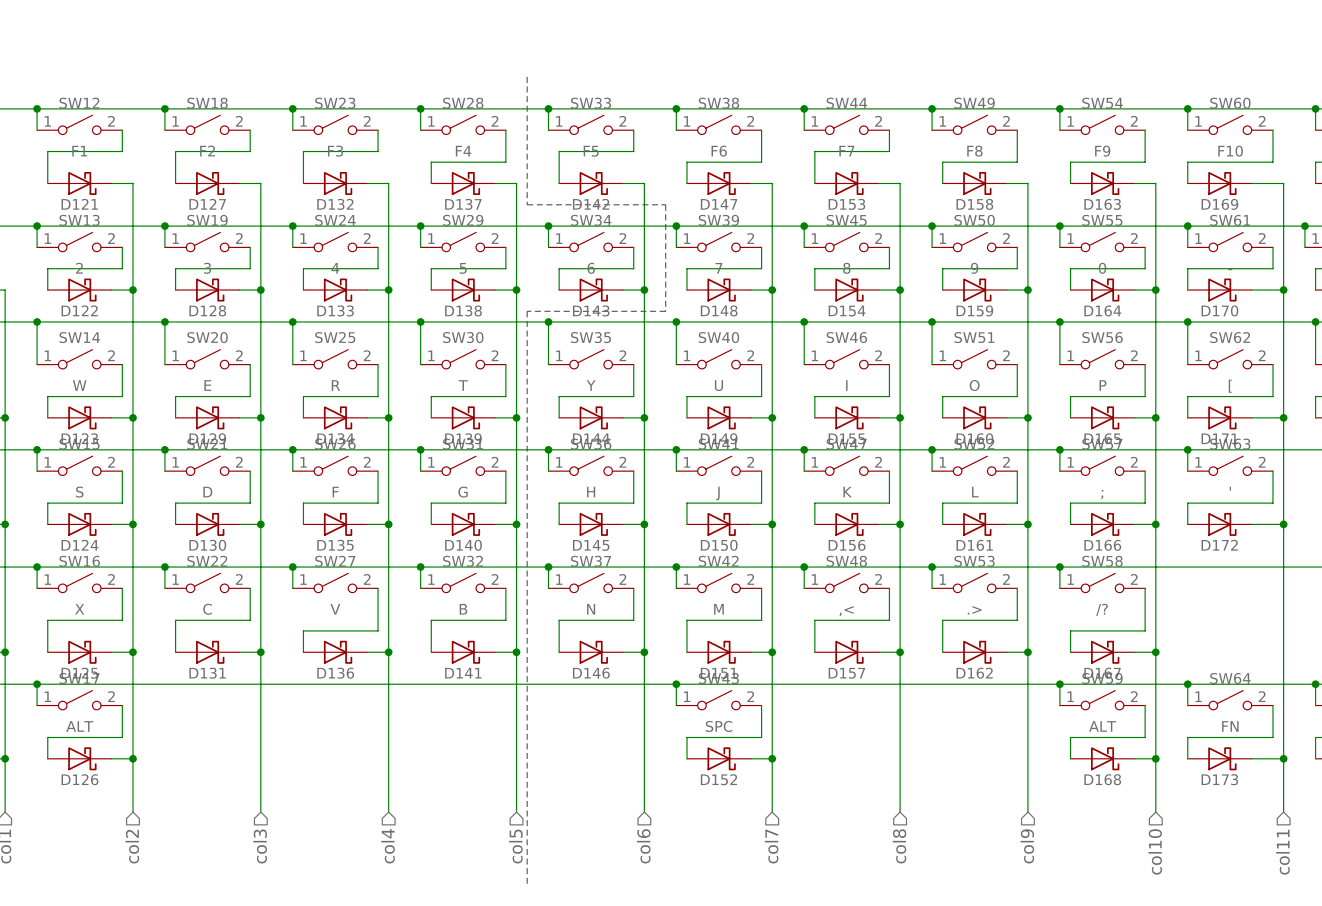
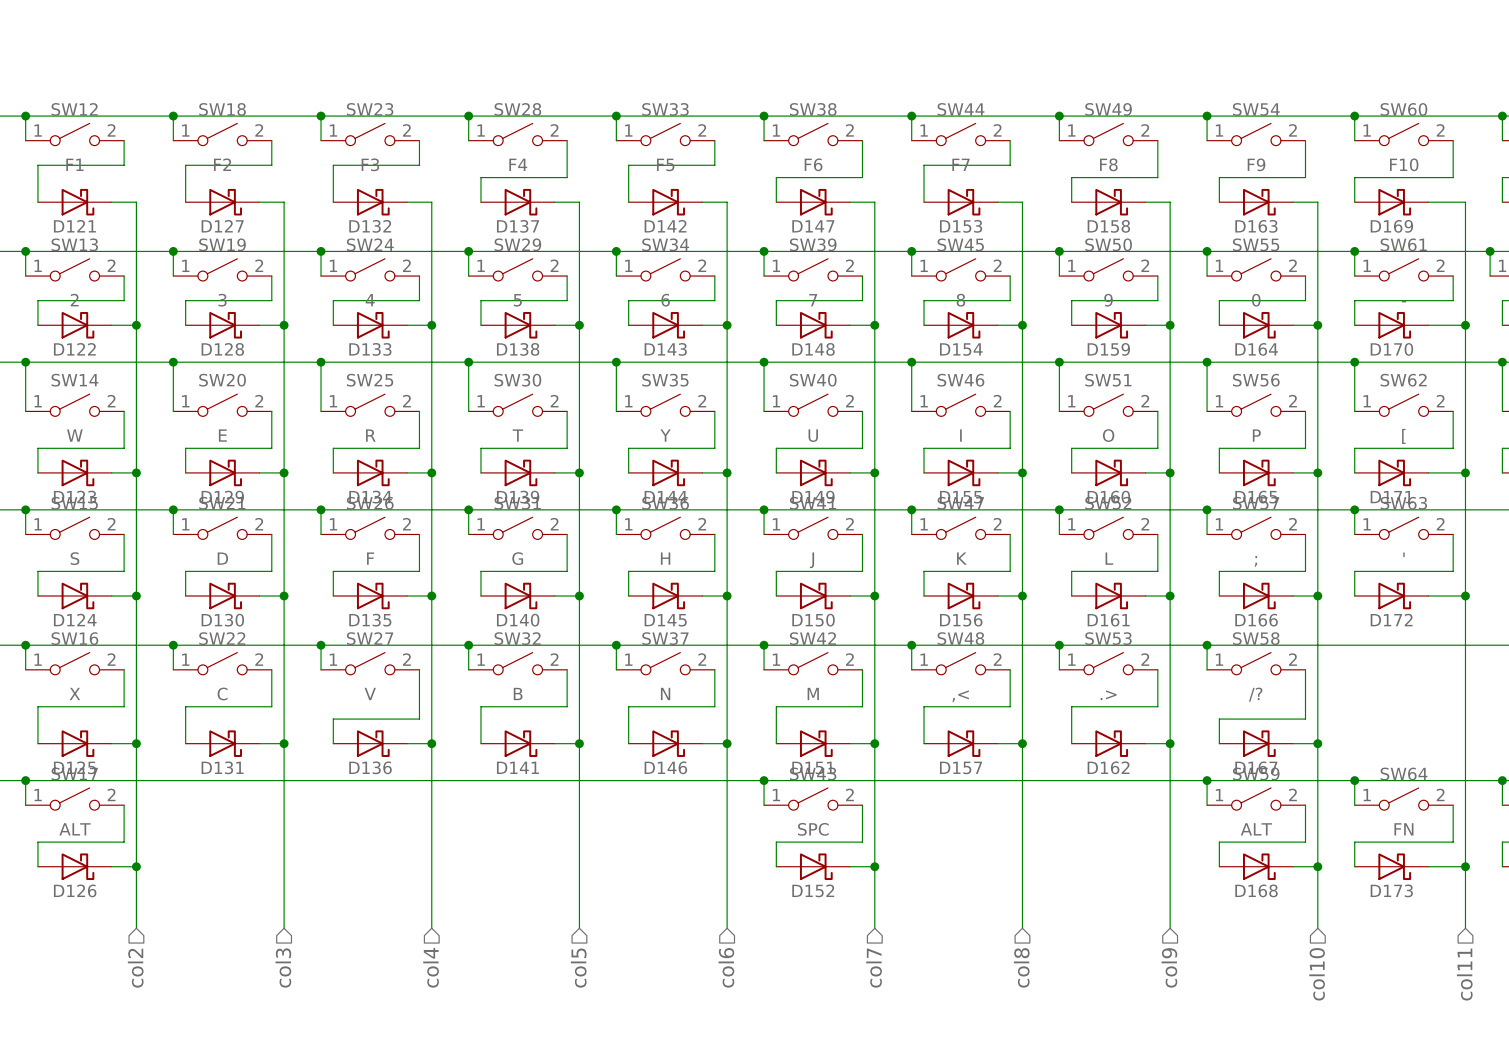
line: (527, 76) (527, 204) (665, 204) (665, 311) (527, 311) (527, 886) -> none

